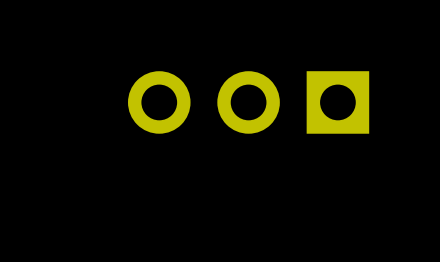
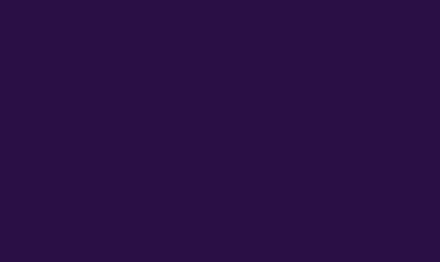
part: (248, 102) -> none

